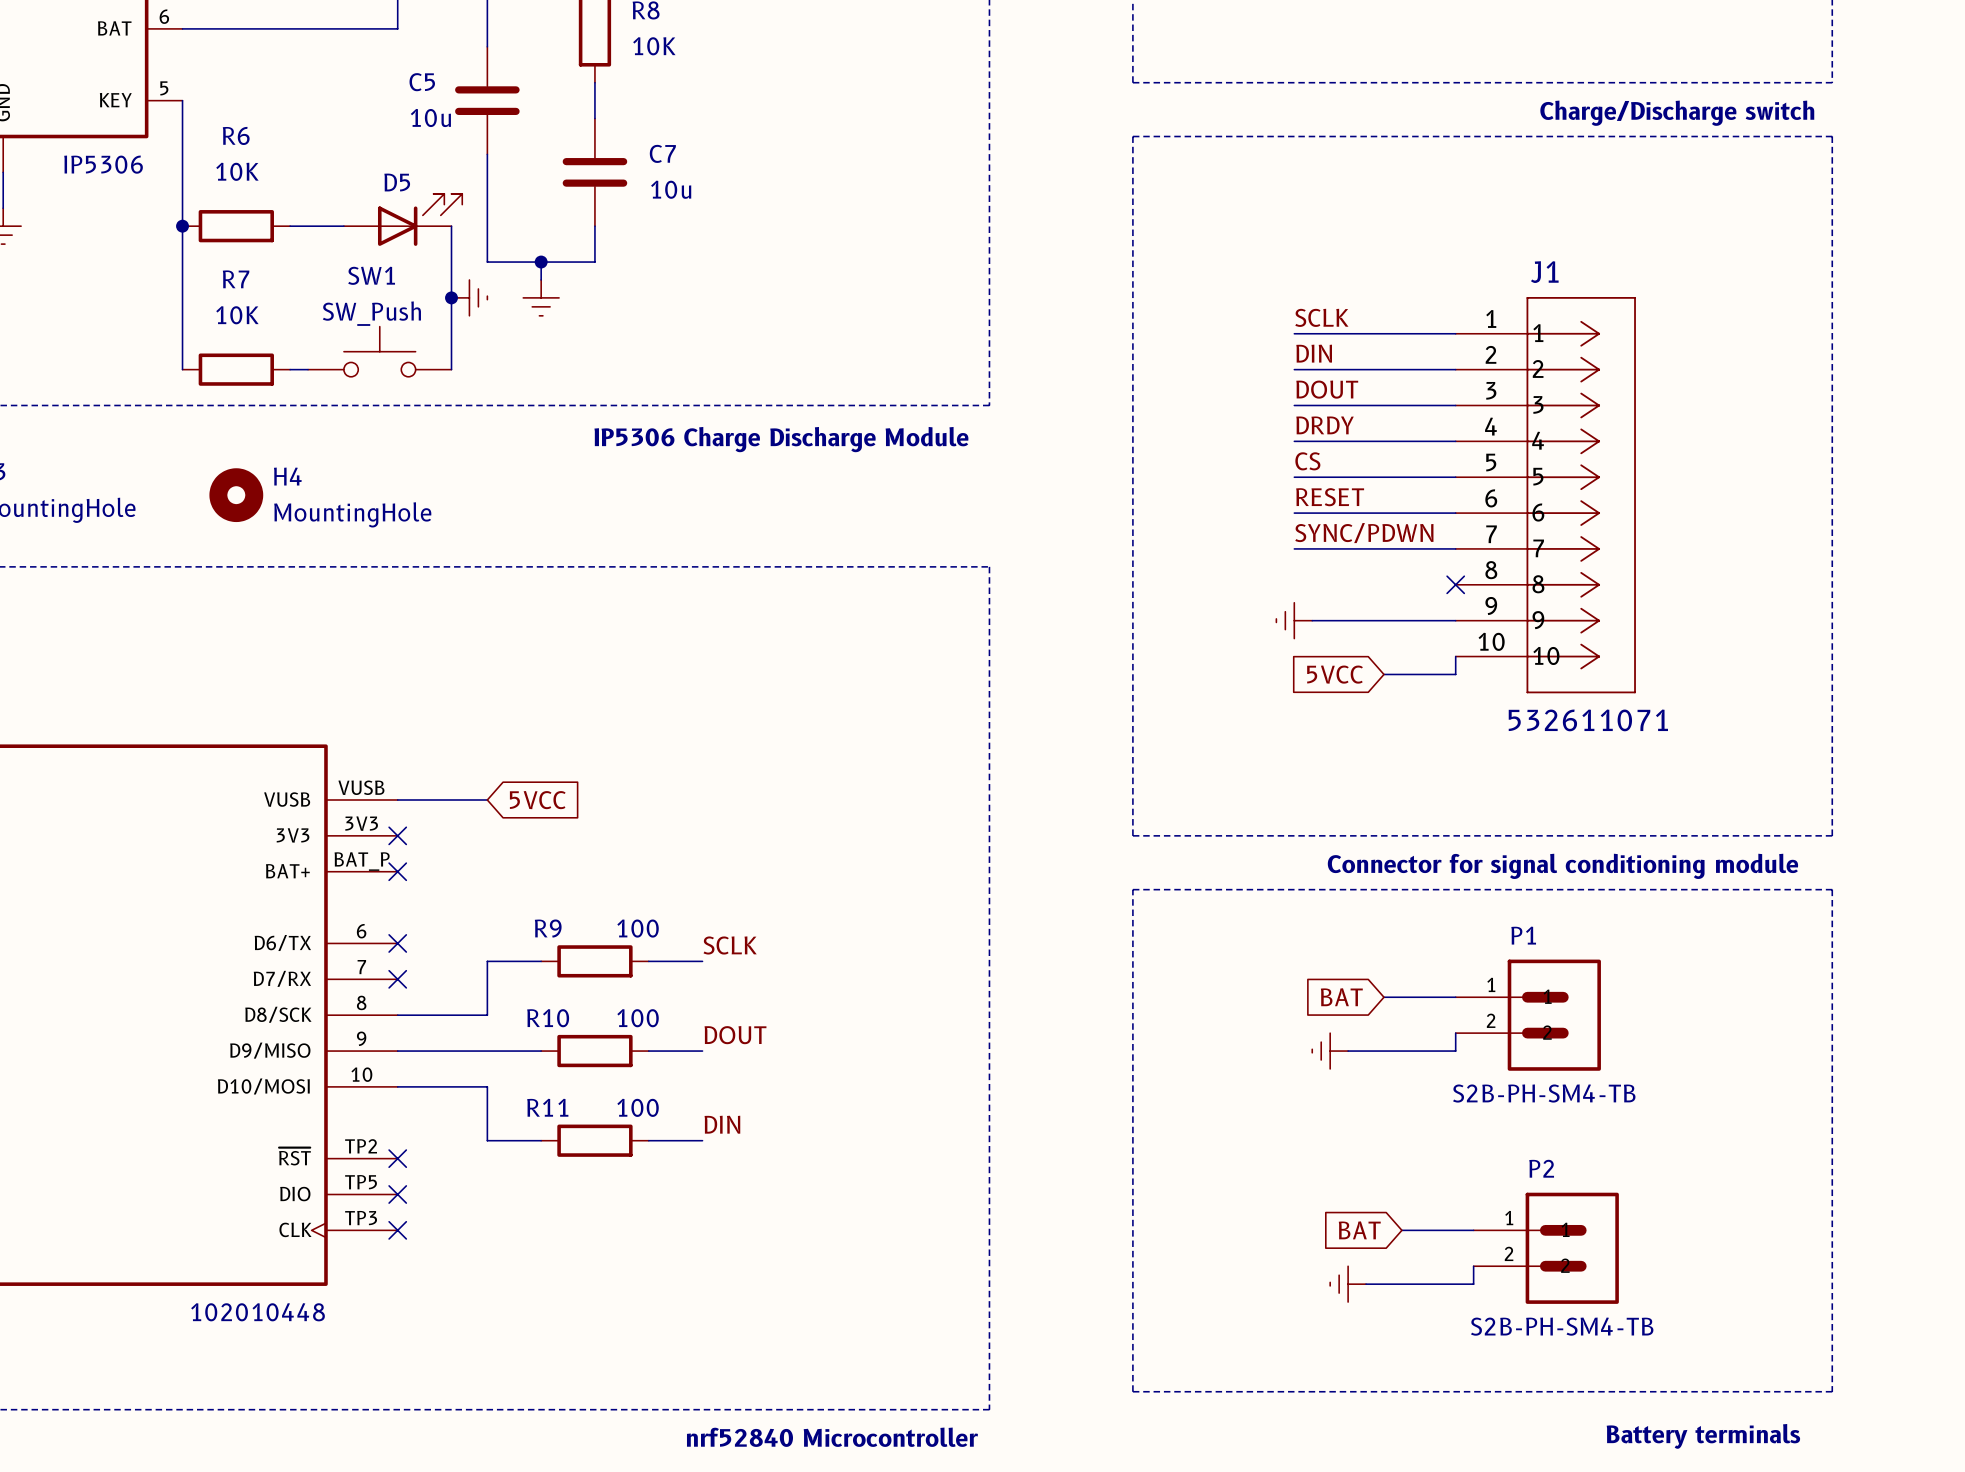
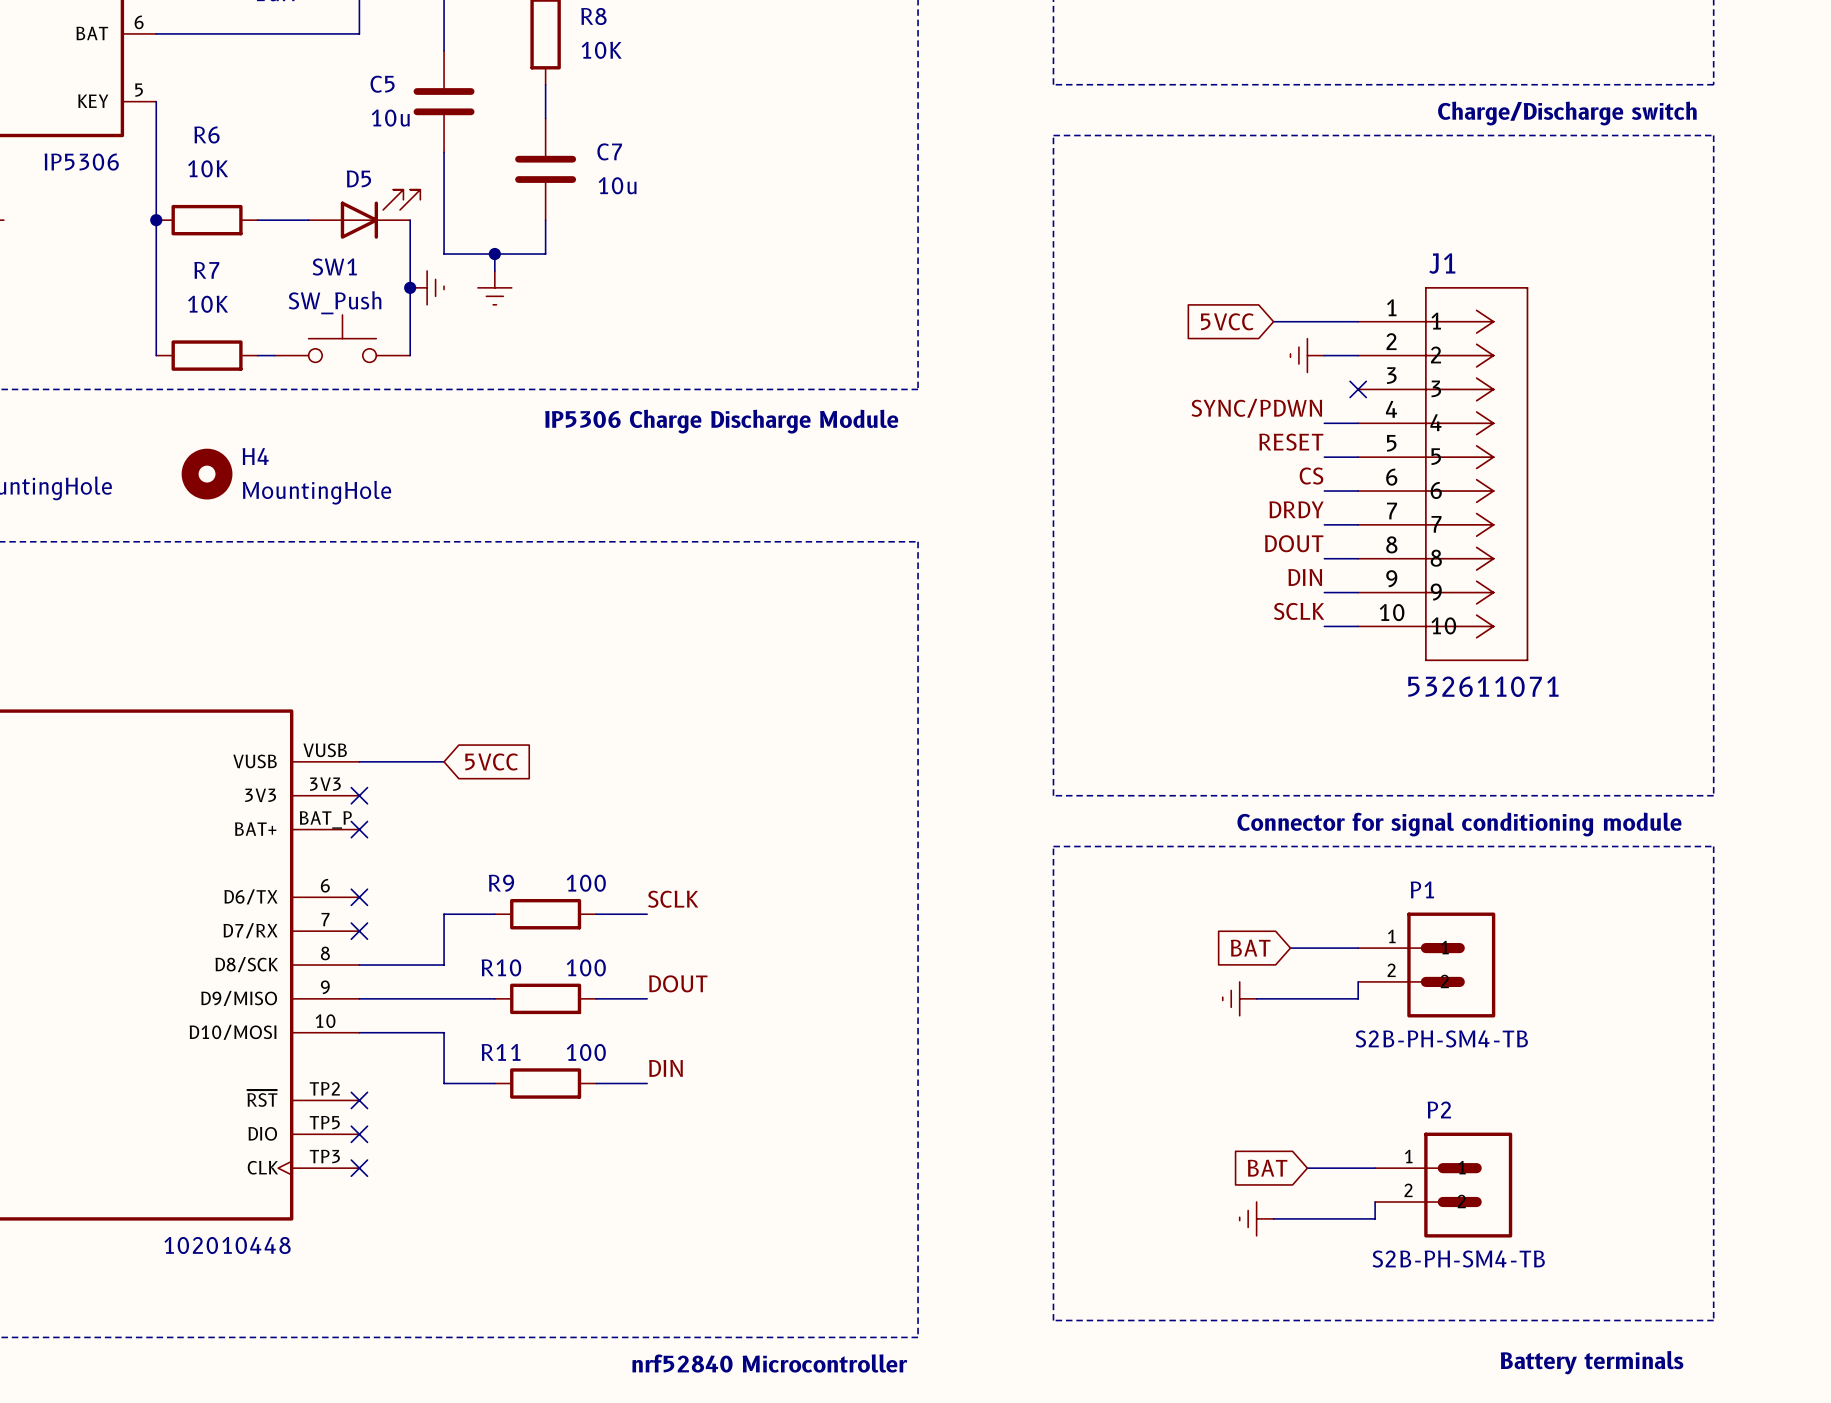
label position: SCLK (1321, 317) -> SCLK (1299, 611)
wire: (1294, 333) (1366, 333) -> none
label position: DIN (1314, 353) -> DIN (1305, 577)
wire: (1294, 369) (1419, 369) -> none
label position: DOUT (1327, 389) -> DOUT (1294, 543)
wire: (1294, 405) (1455, 405) -> none
no-connect mark: none -> (1358, 389)
label position: DRDY (1325, 425) -> DRDY (1296, 509)
wire: (1294, 441) (1419, 441) -> none
label position: CS (1307, 461) -> CS (1311, 476)
wire: (1294, 477) (1419, 477) -> none
label position: RESET (1330, 497) -> RESET (1291, 442)
wire: (1294, 513) (1419, 513) -> none
label position: SYNC/PDWN (1364, 533) -> SYNC/PDWN (1256, 408)
wire: (1294, 548) (1419, 548) -> none
wire: none -> (1324, 558) (1358, 558)
no-connect mark: (1455, 584) -> none
power symbol position: (1294, 620) -> (1307, 355)
wire: (1312, 620) (1419, 620) -> none
wire: (1455, 656) (1455, 674) (1383, 674) -> (1358, 626) (1324, 626)
global label position: 5VCC (1335, 674) -> 5VCC (1227, 321)

